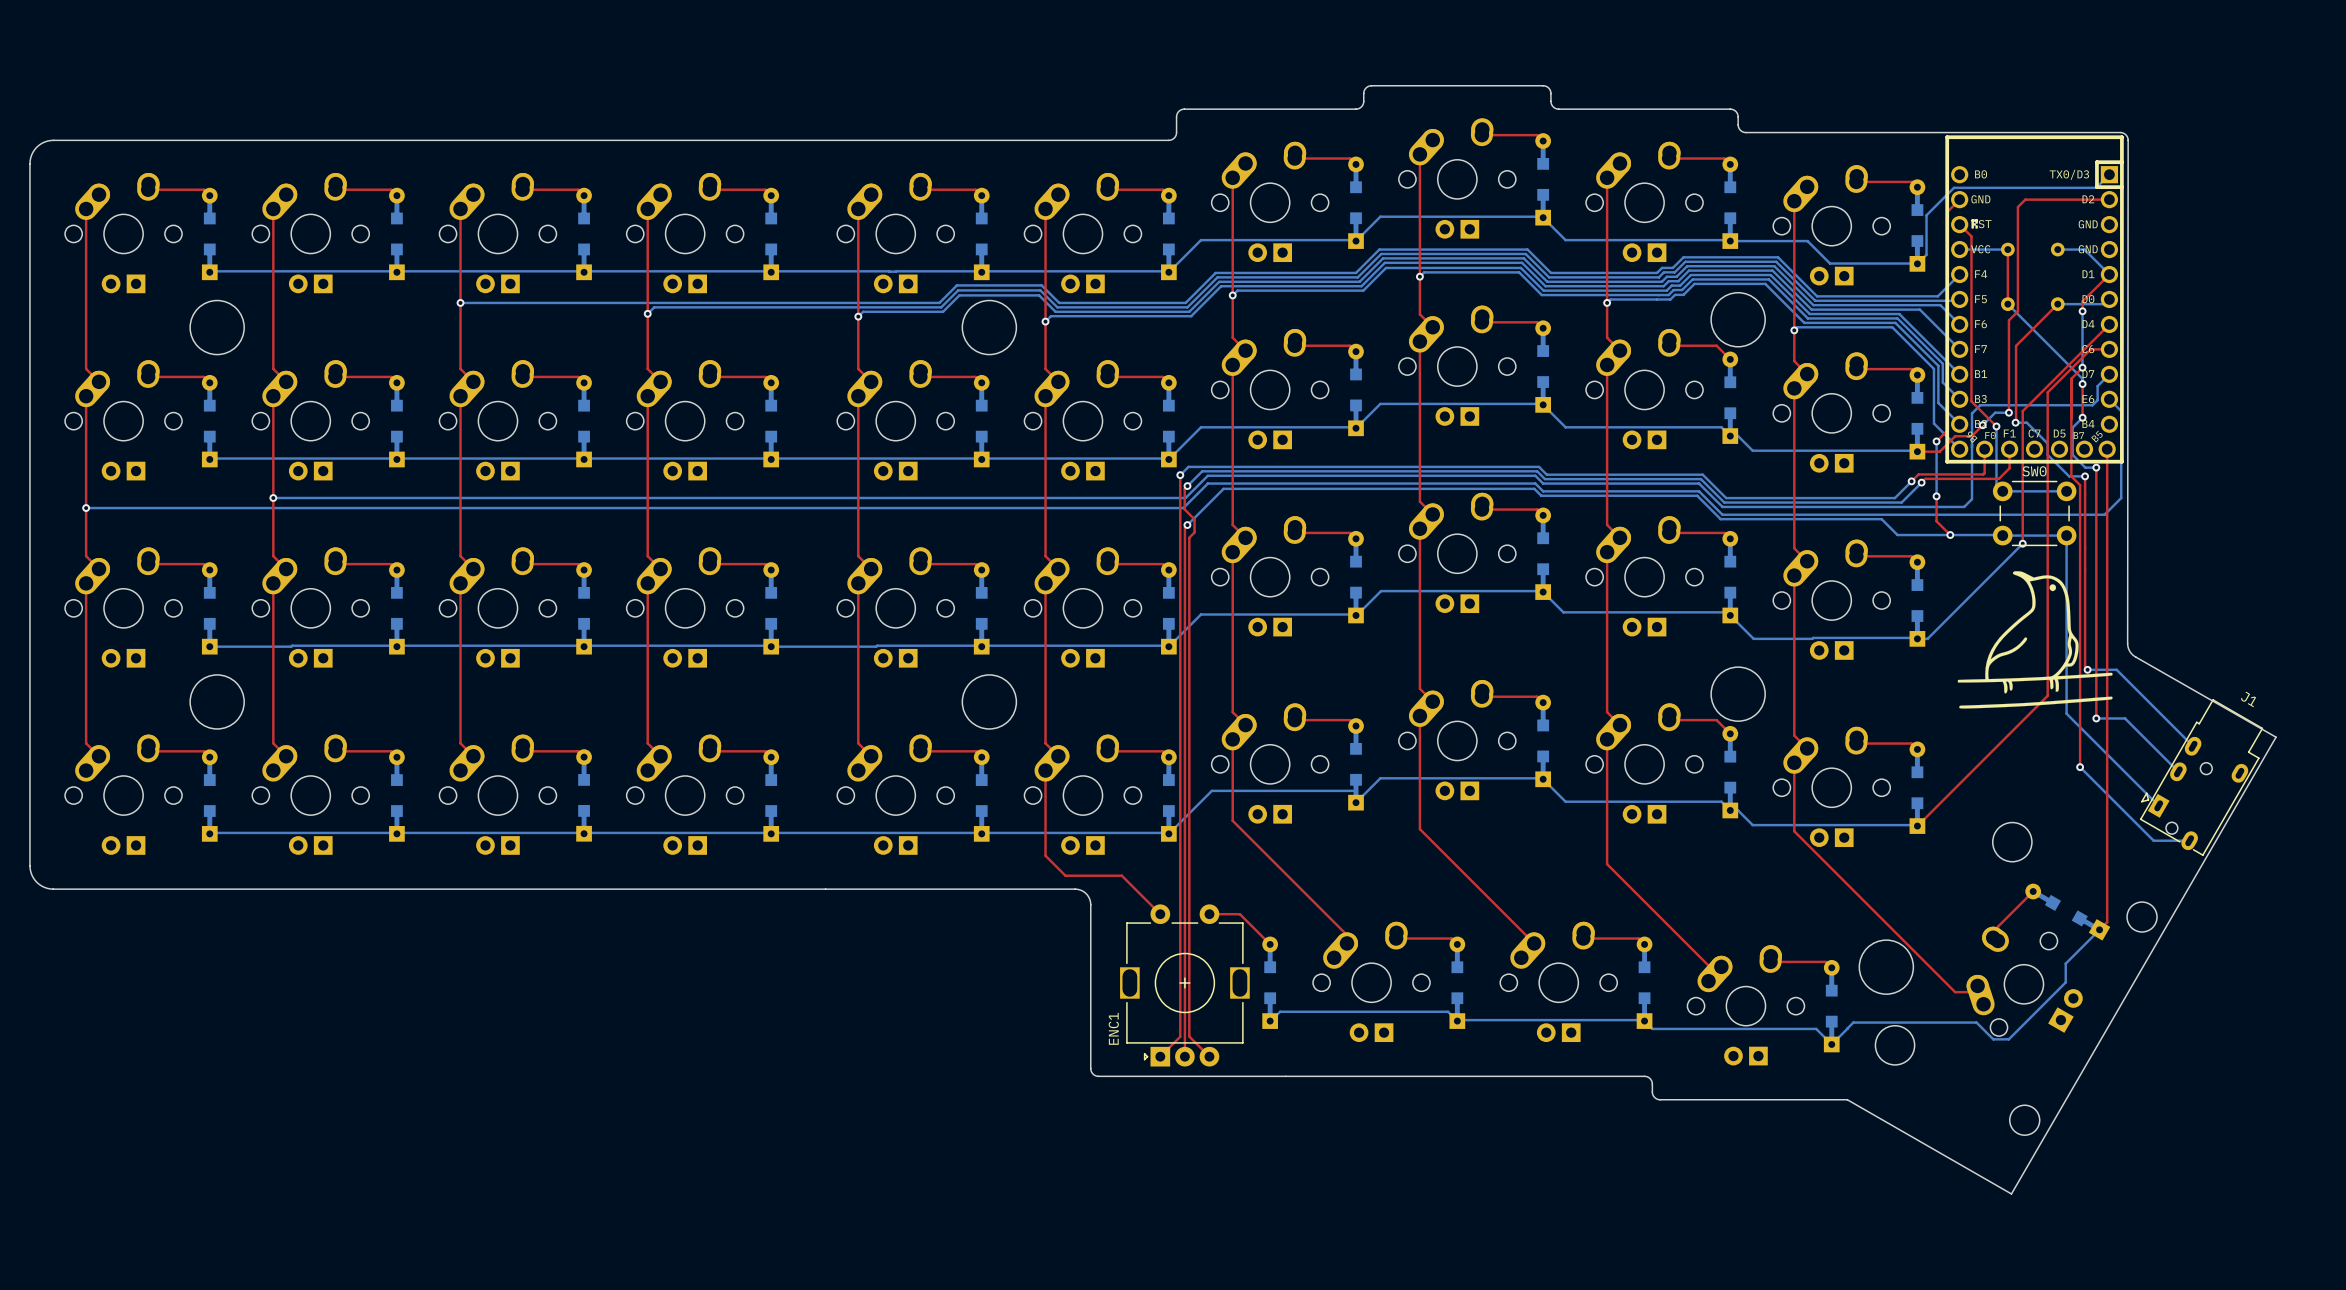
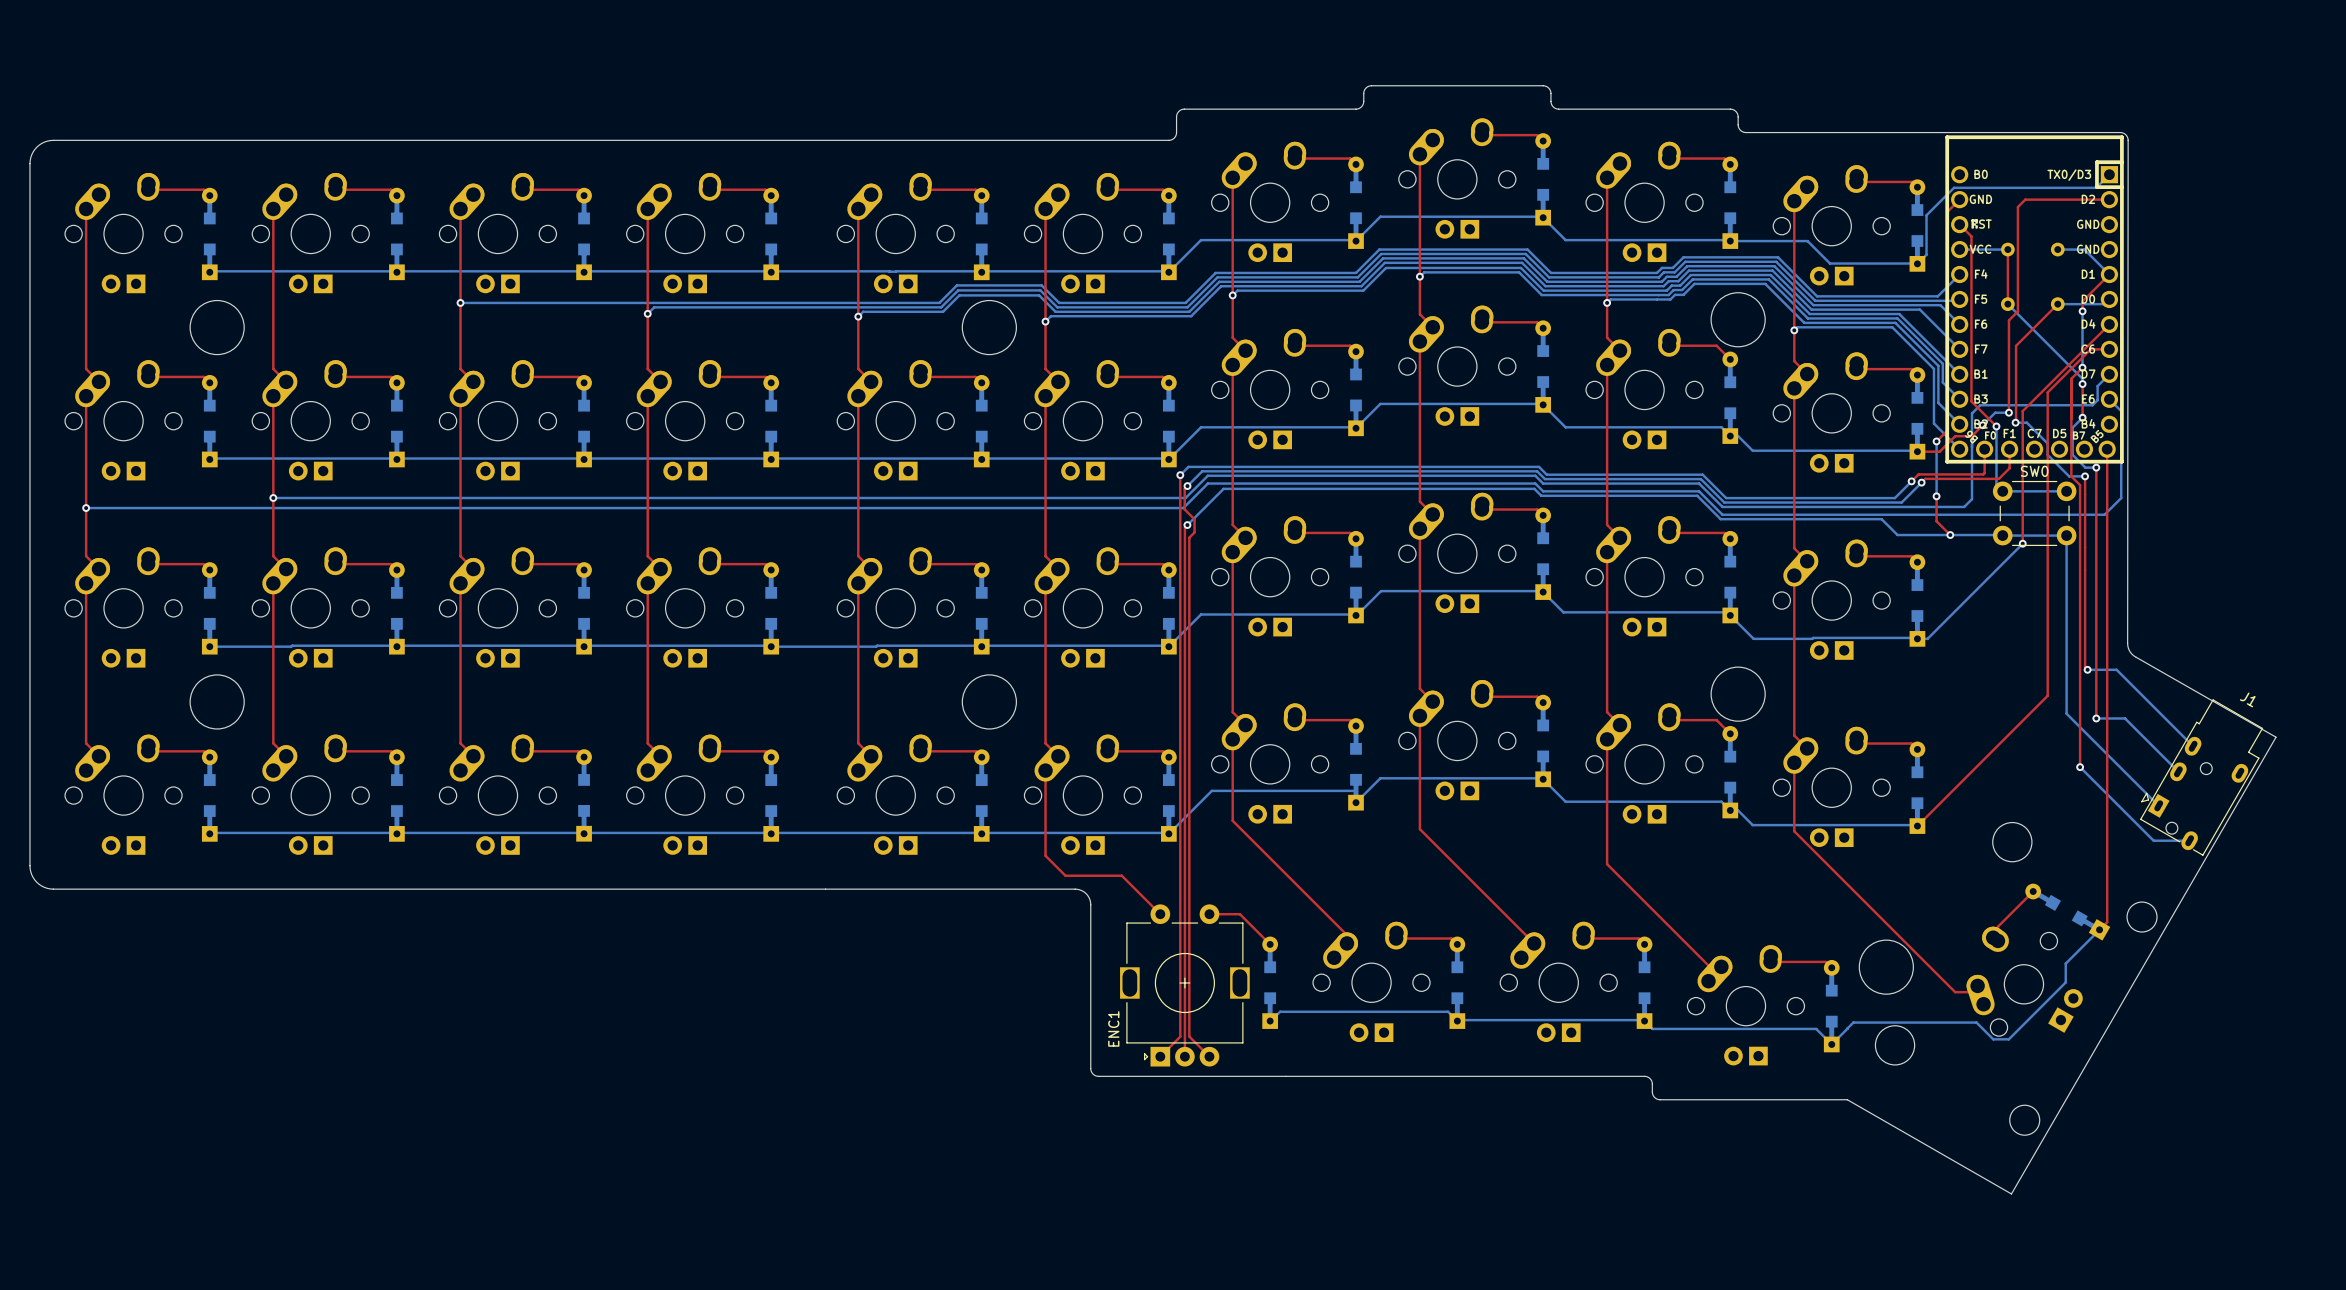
drawing: [1957, 571, 2113, 709] -> none

